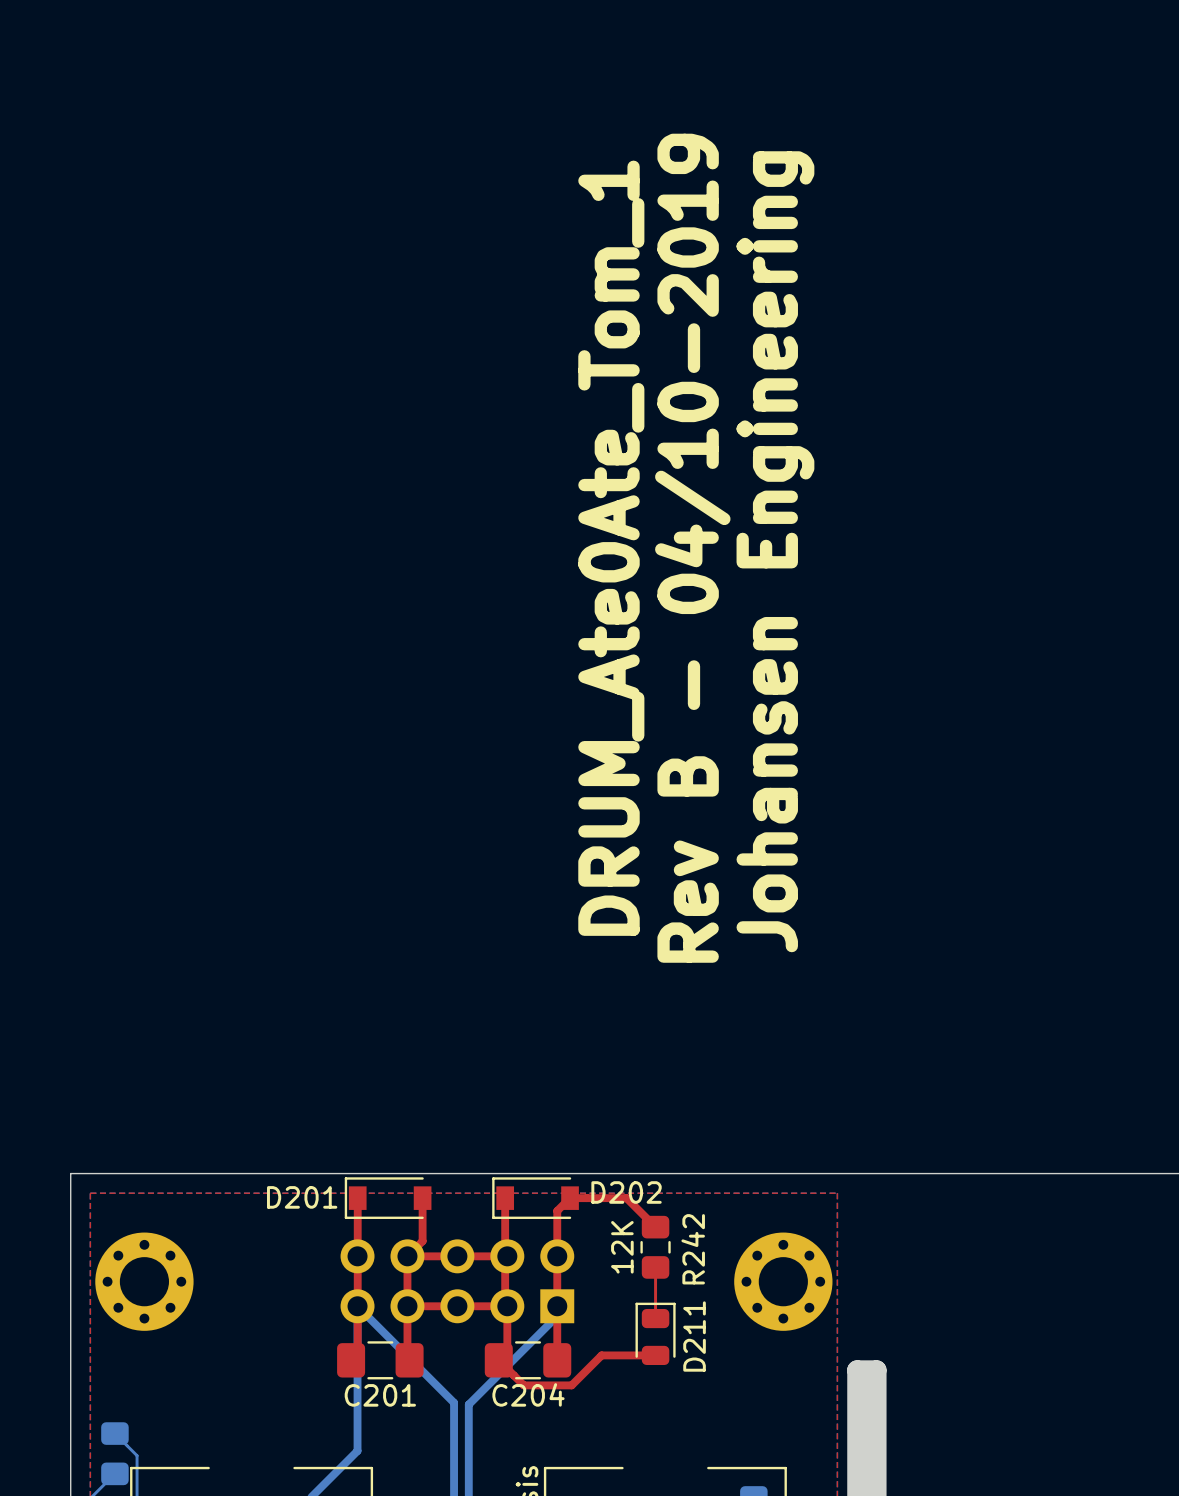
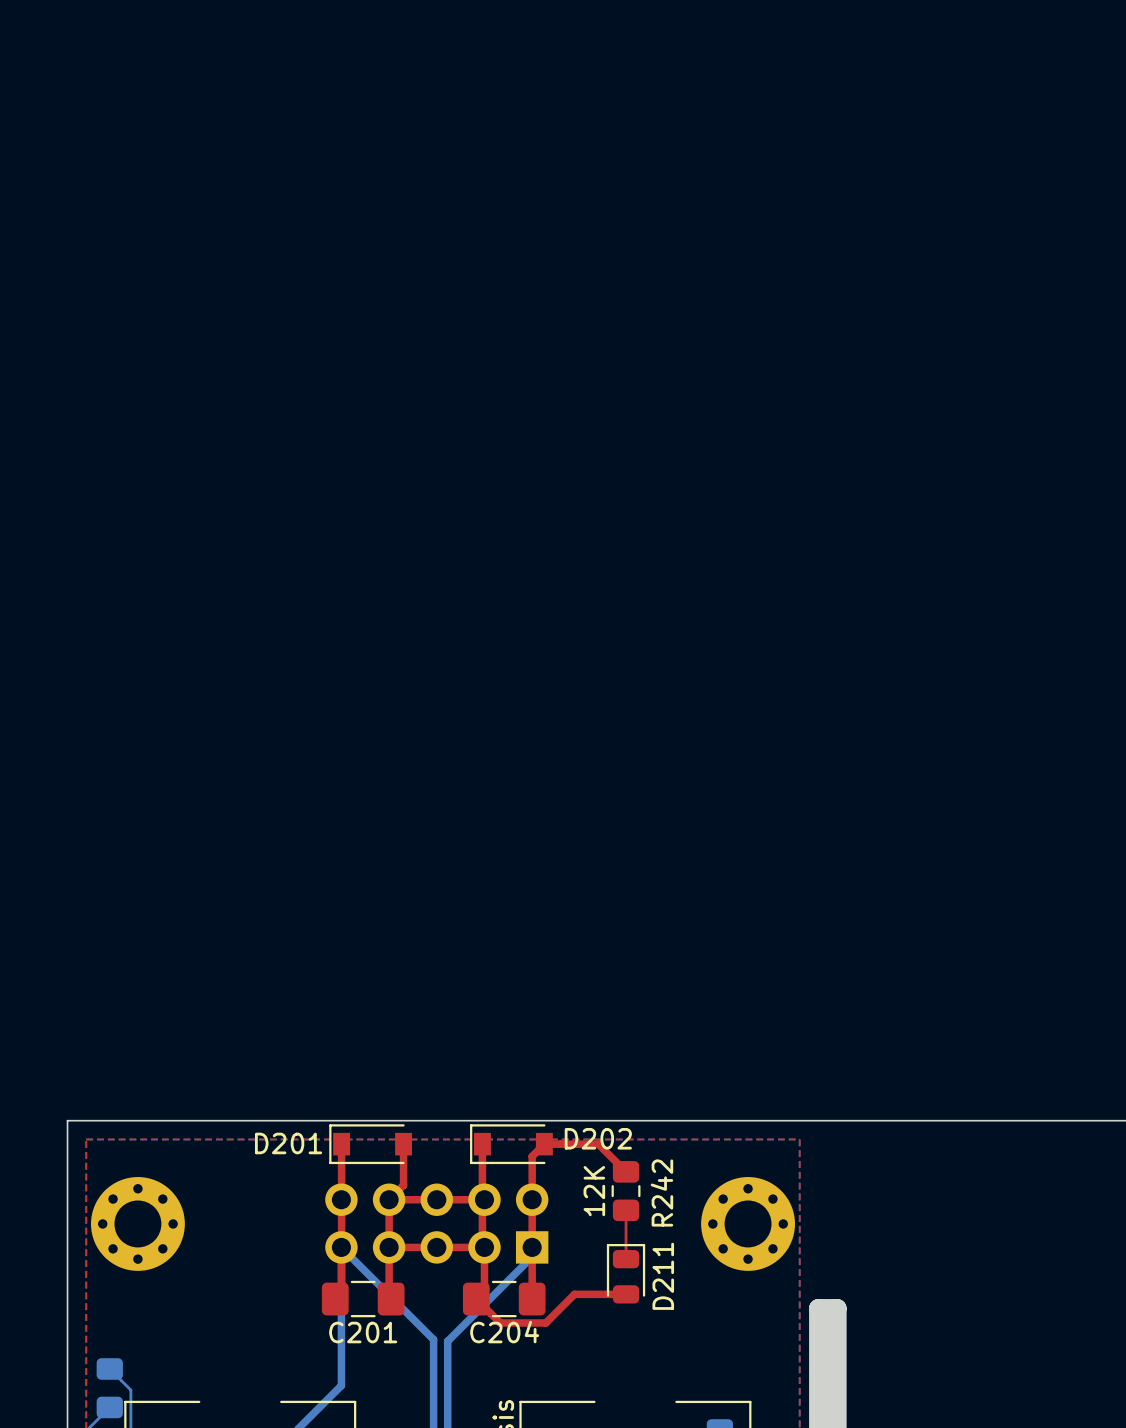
text: DRUM_Ate0Ate_Tom_1 (611, 548) -> none
text: Rev B - 04/10-2019 (692, 548) -> none
text: Johansen Engineering (775, 551) -> none

